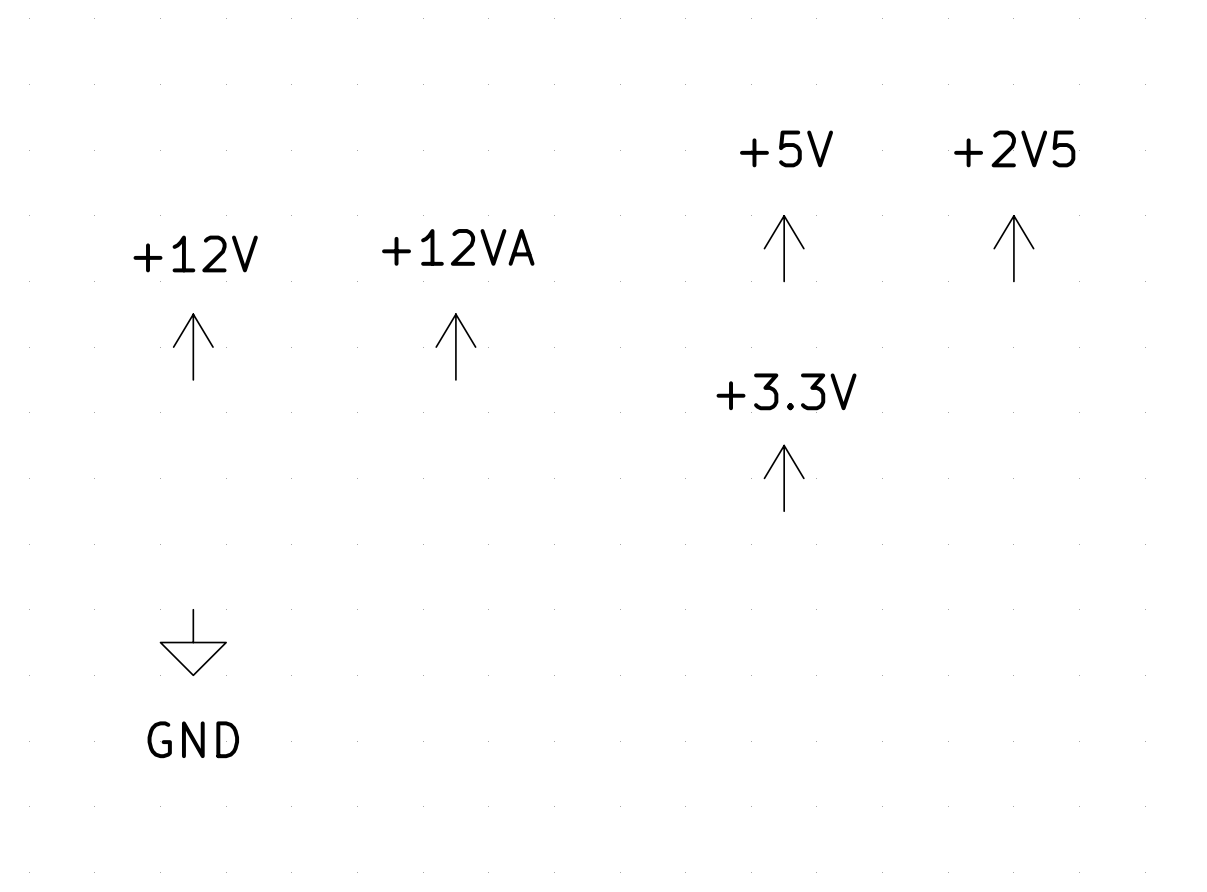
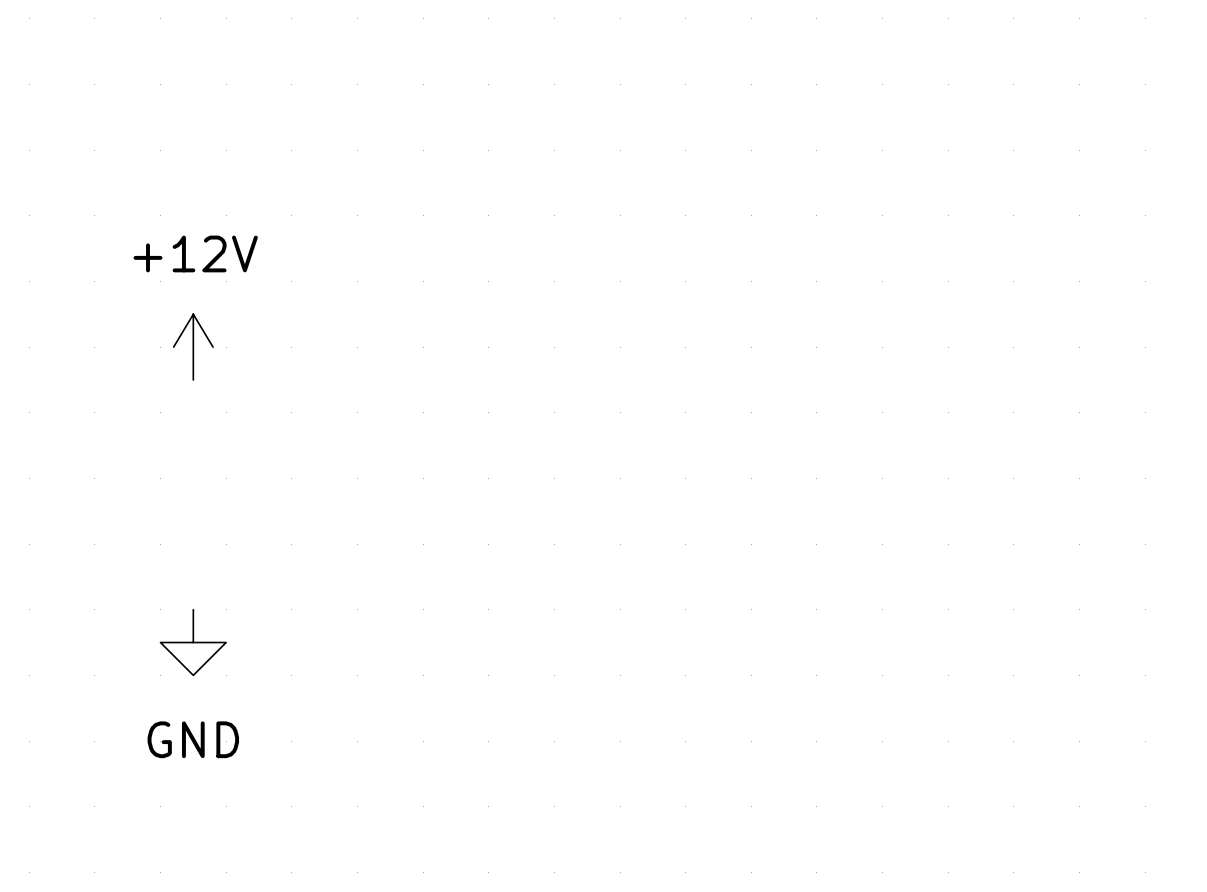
power symbol: +5V (784, 248) -> none
power symbol: +2V5 (1013, 248) -> none
power symbol: +12VA (455, 347) -> none
power symbol: +3.3V (784, 478) -> none

